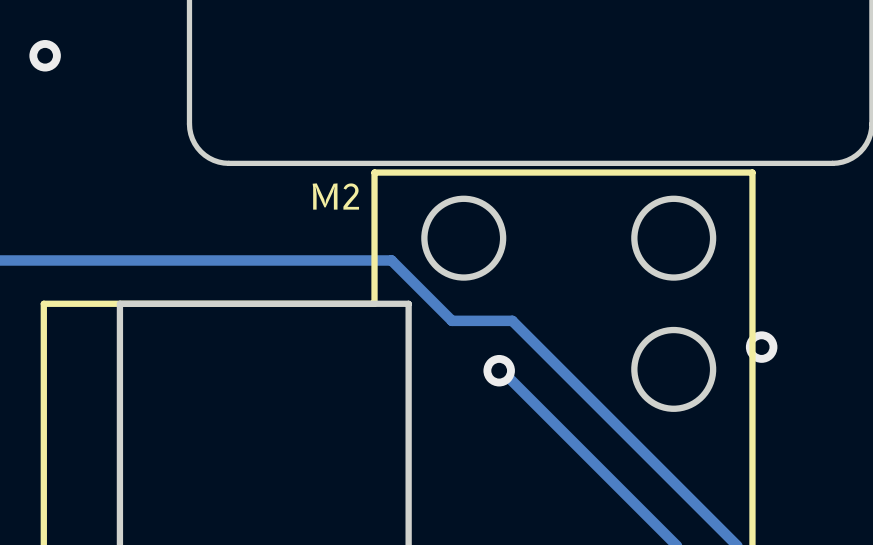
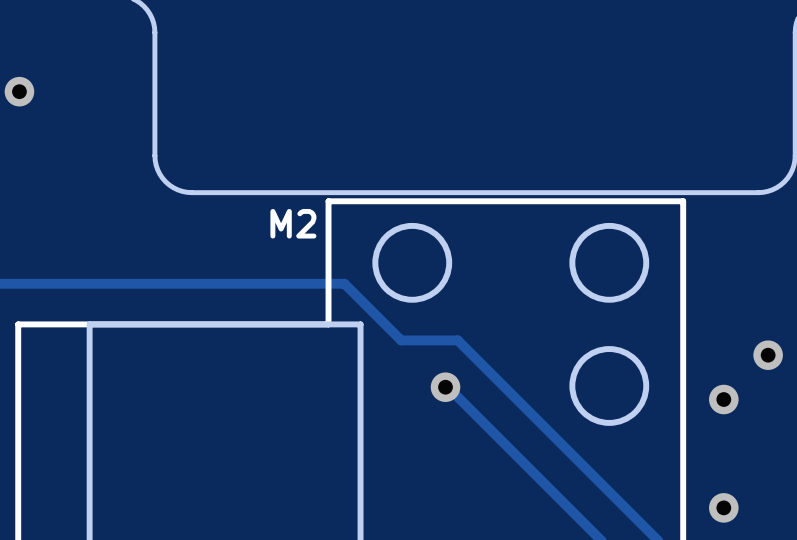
via: none -> (768, 355)
via: (761, 347) -> none
via: none -> (723, 399)
via: none -> (723, 507)

